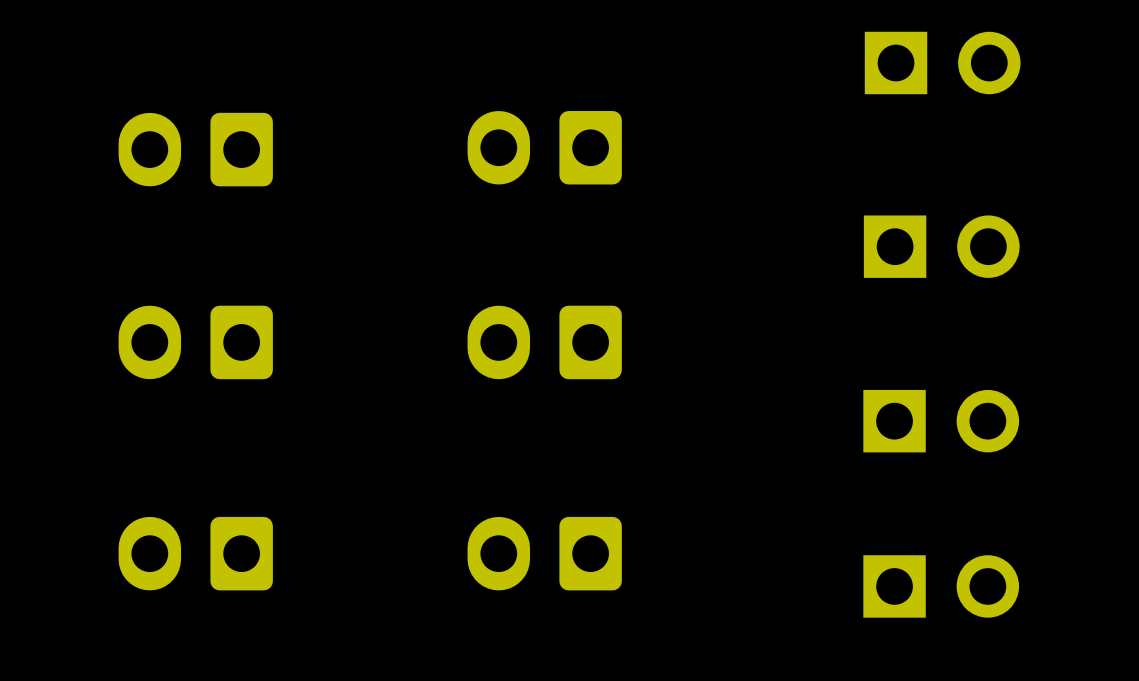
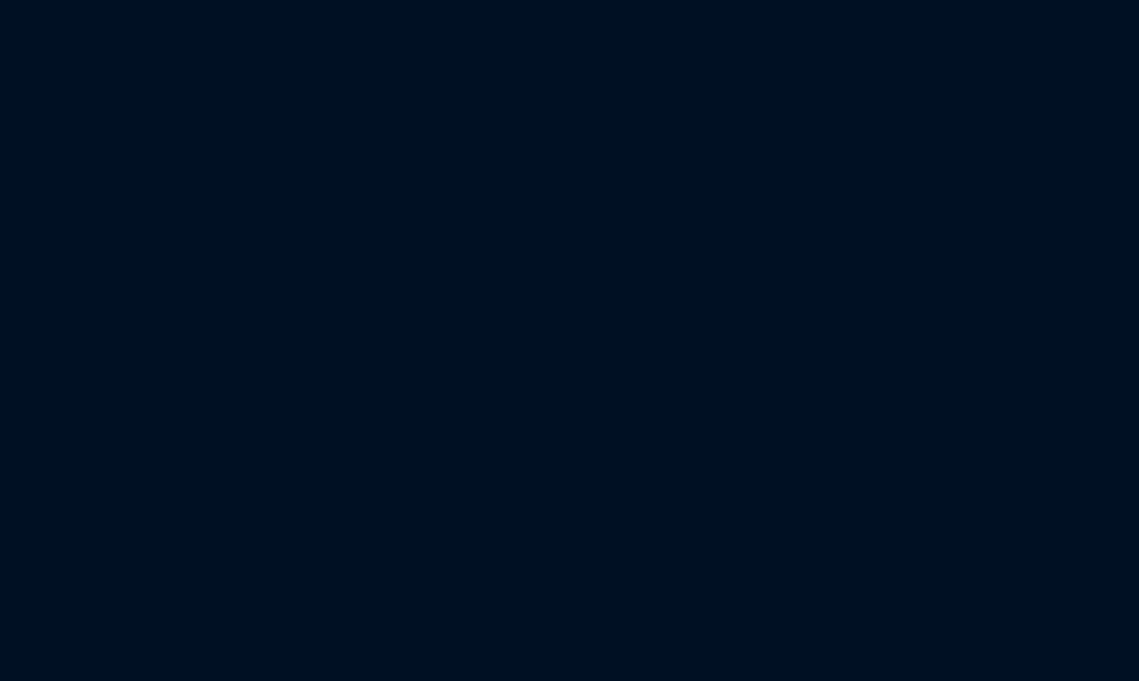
part: (942, 63) -> none
part: (544, 147) -> none
part: (195, 149) -> none
part: (941, 246) -> none
part: (195, 342) -> none
part: (544, 342) -> none
part: (941, 421) -> none
part: (195, 553) -> none
part: (544, 553) -> none
part: (941, 586) -> none

